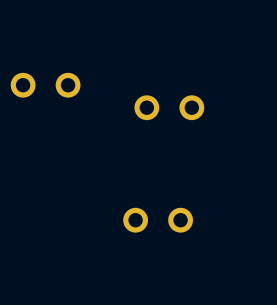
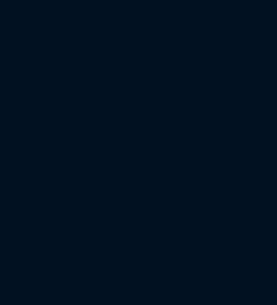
part: (45, 85) -> none
part: (169, 107) -> none
part: (158, 220) -> none

